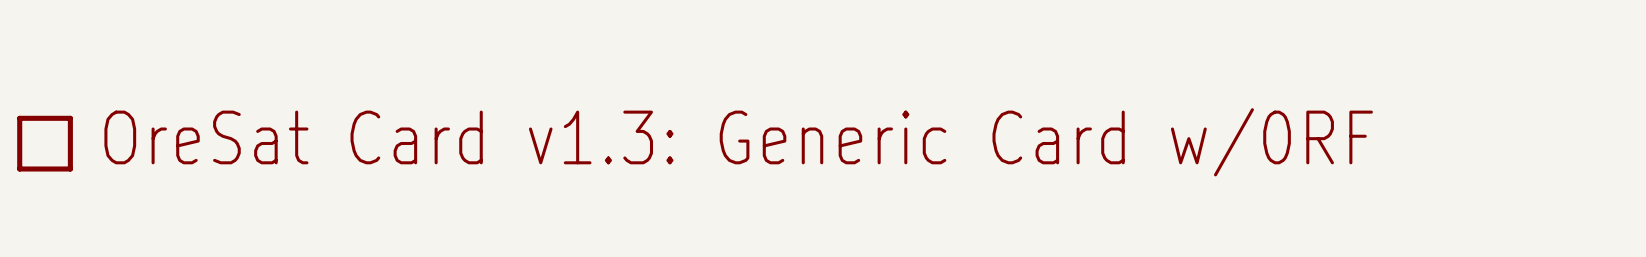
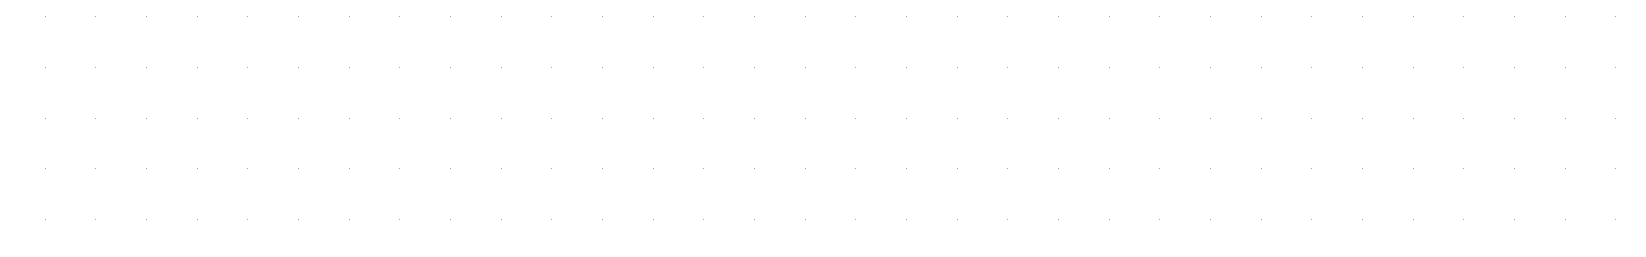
part: (45, 143) -> none

